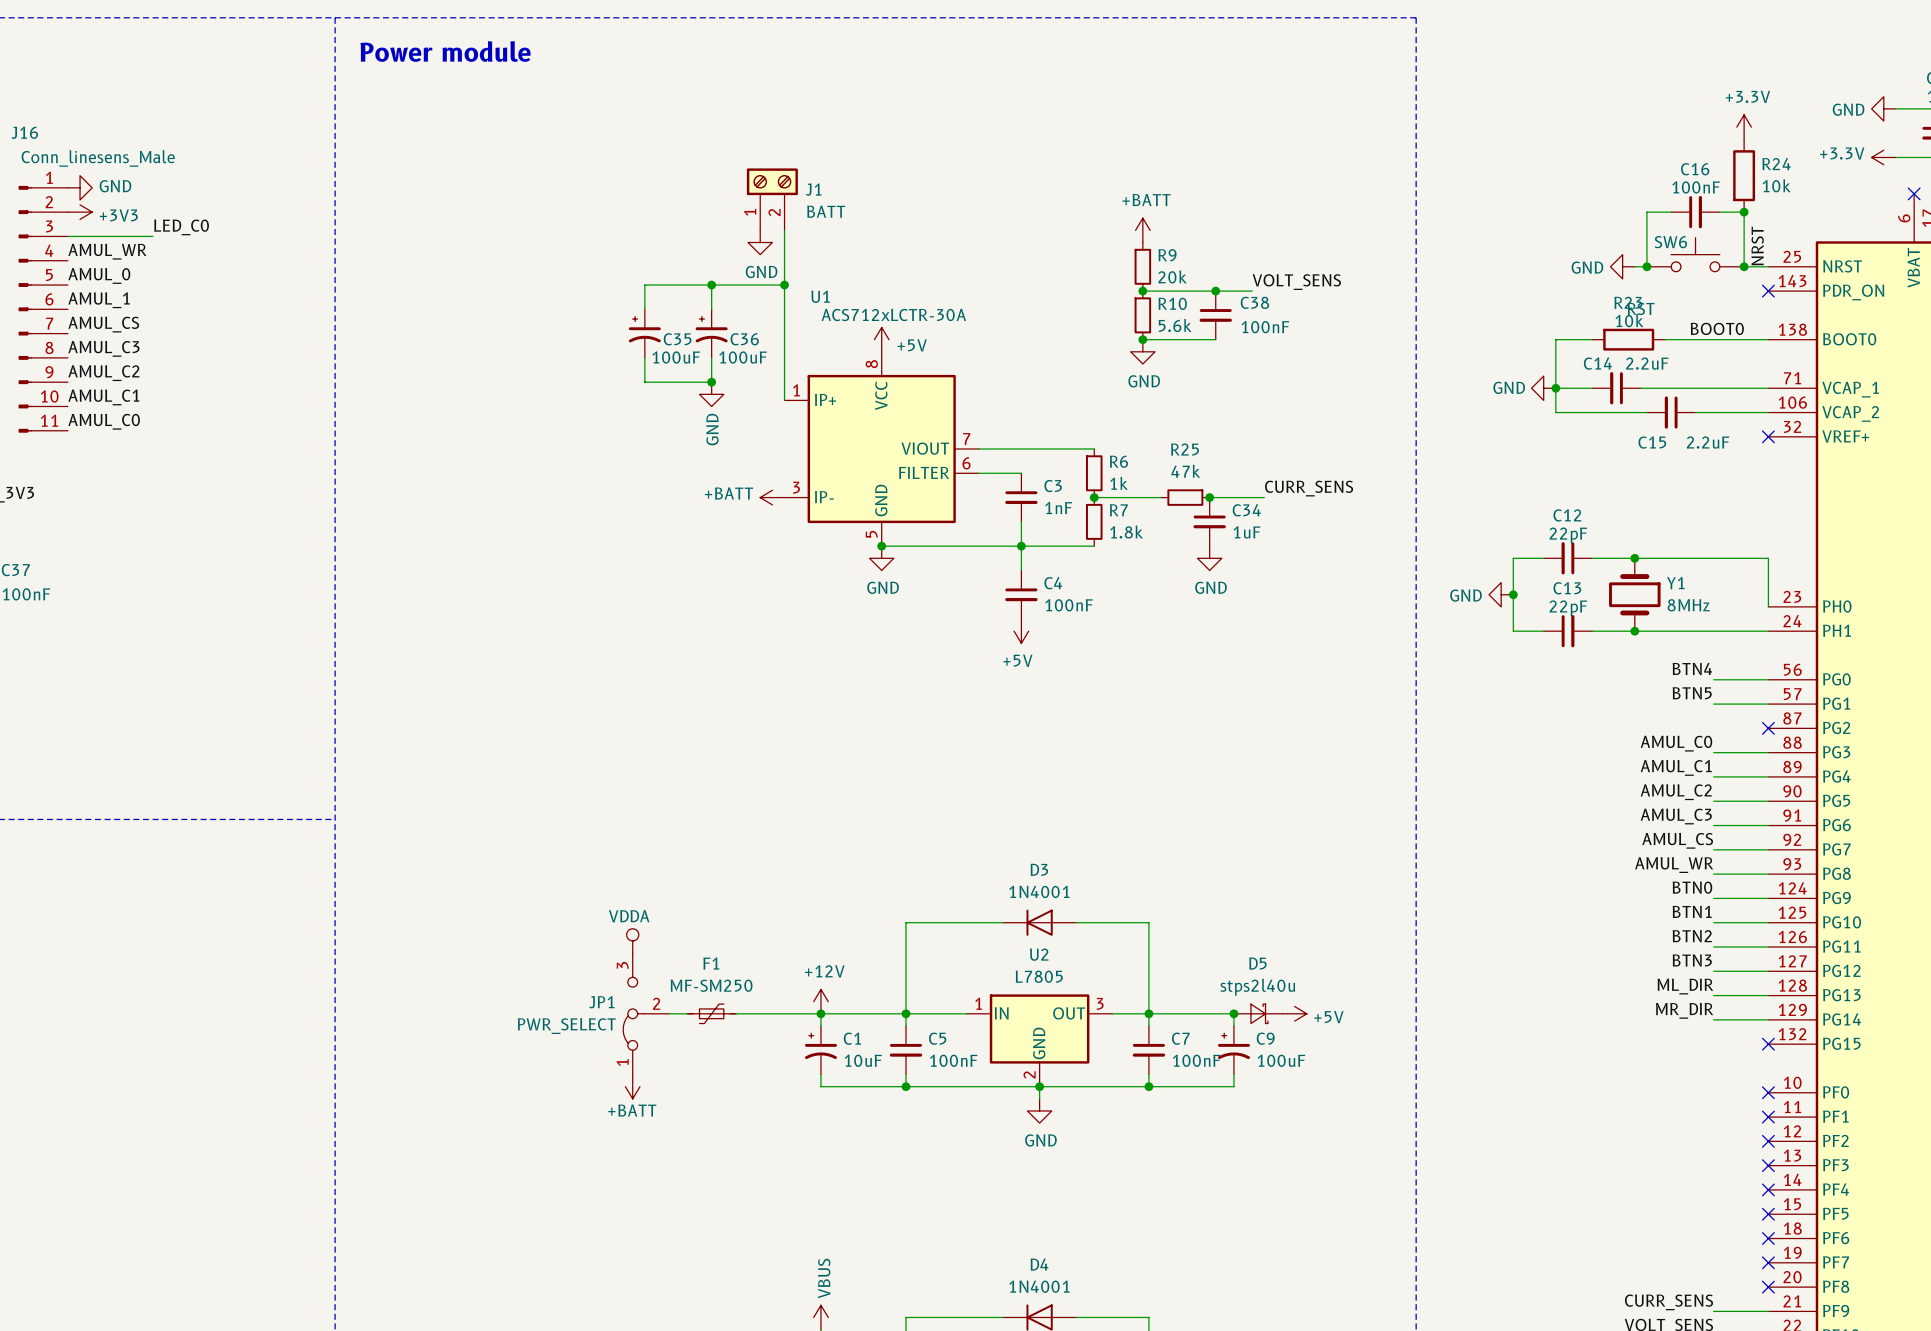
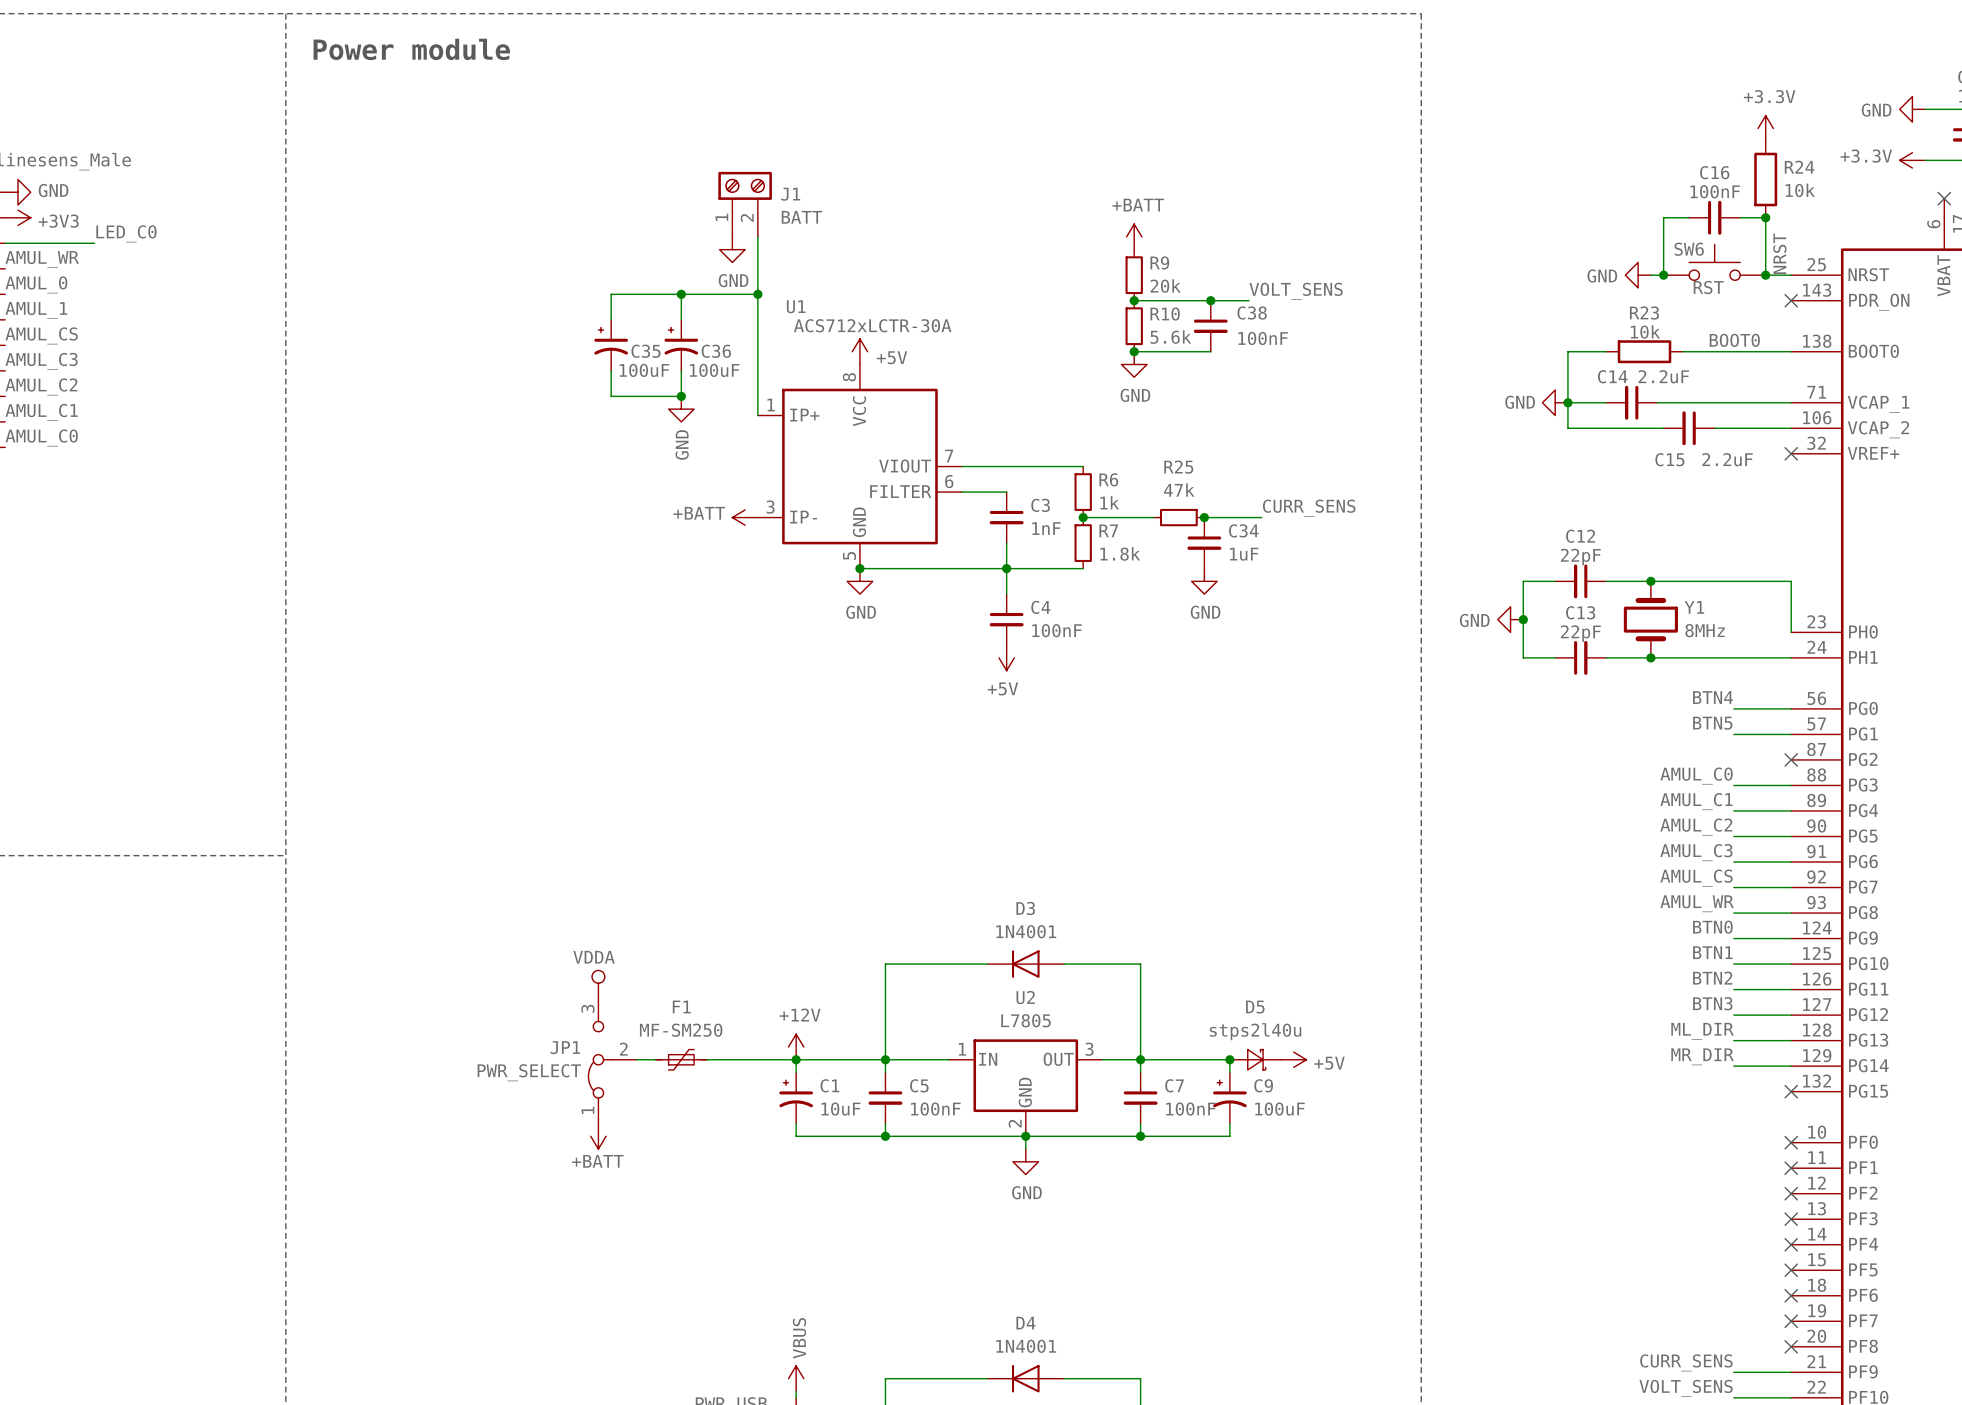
SW6 value position: RST (1641, 308) -> RST (1708, 287)

